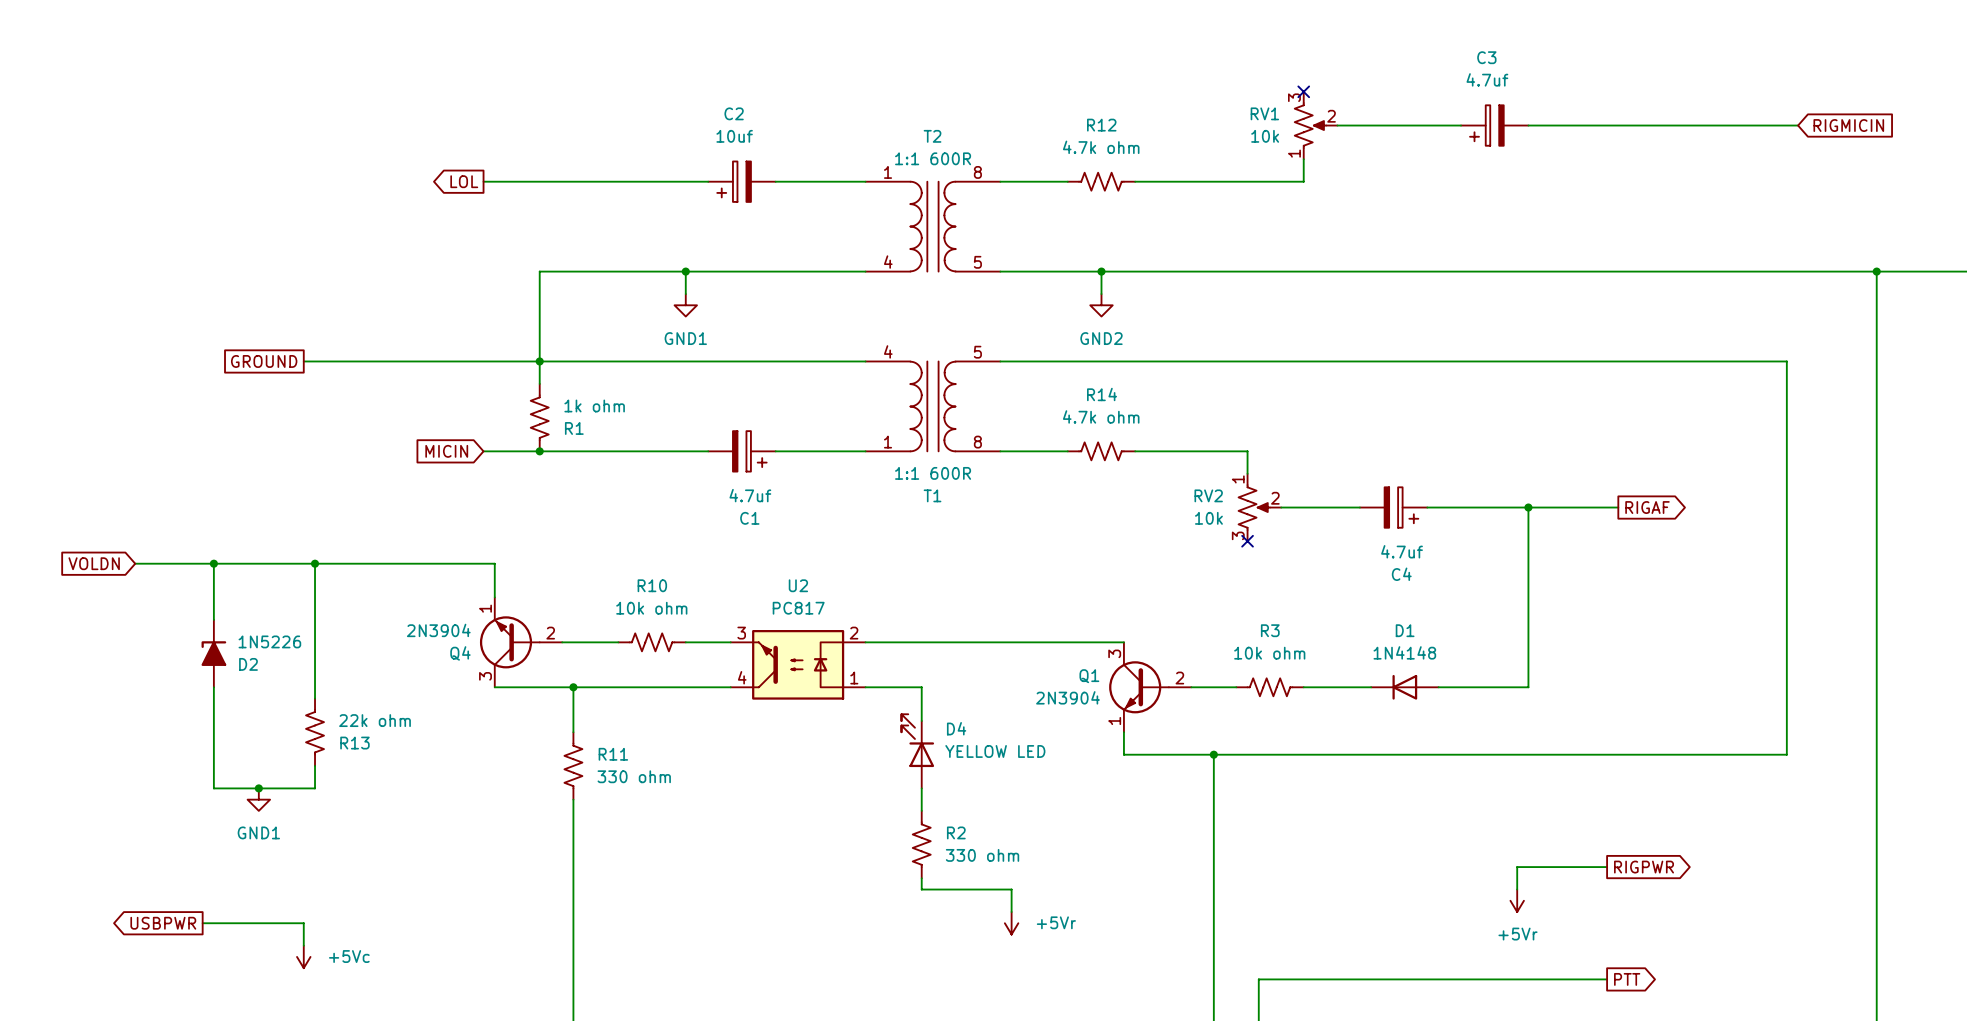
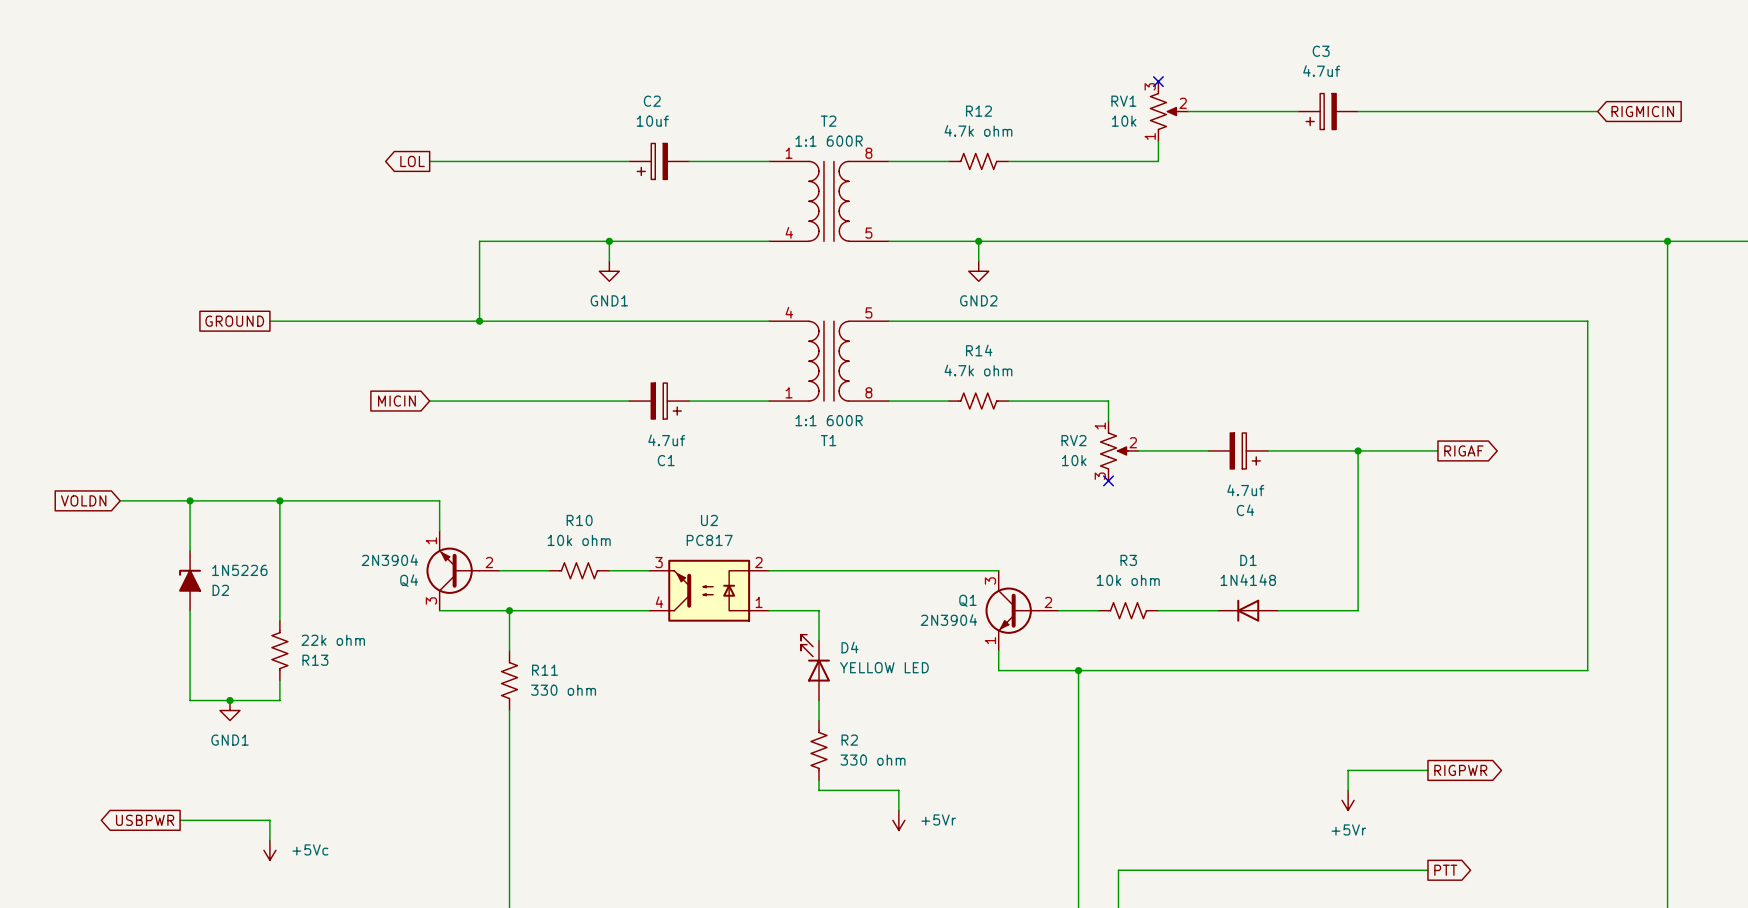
wire: (539, 361) (539, 383) -> none
R1: 1k ohm (539, 417) -> none
junction: (539, 451) -> none

